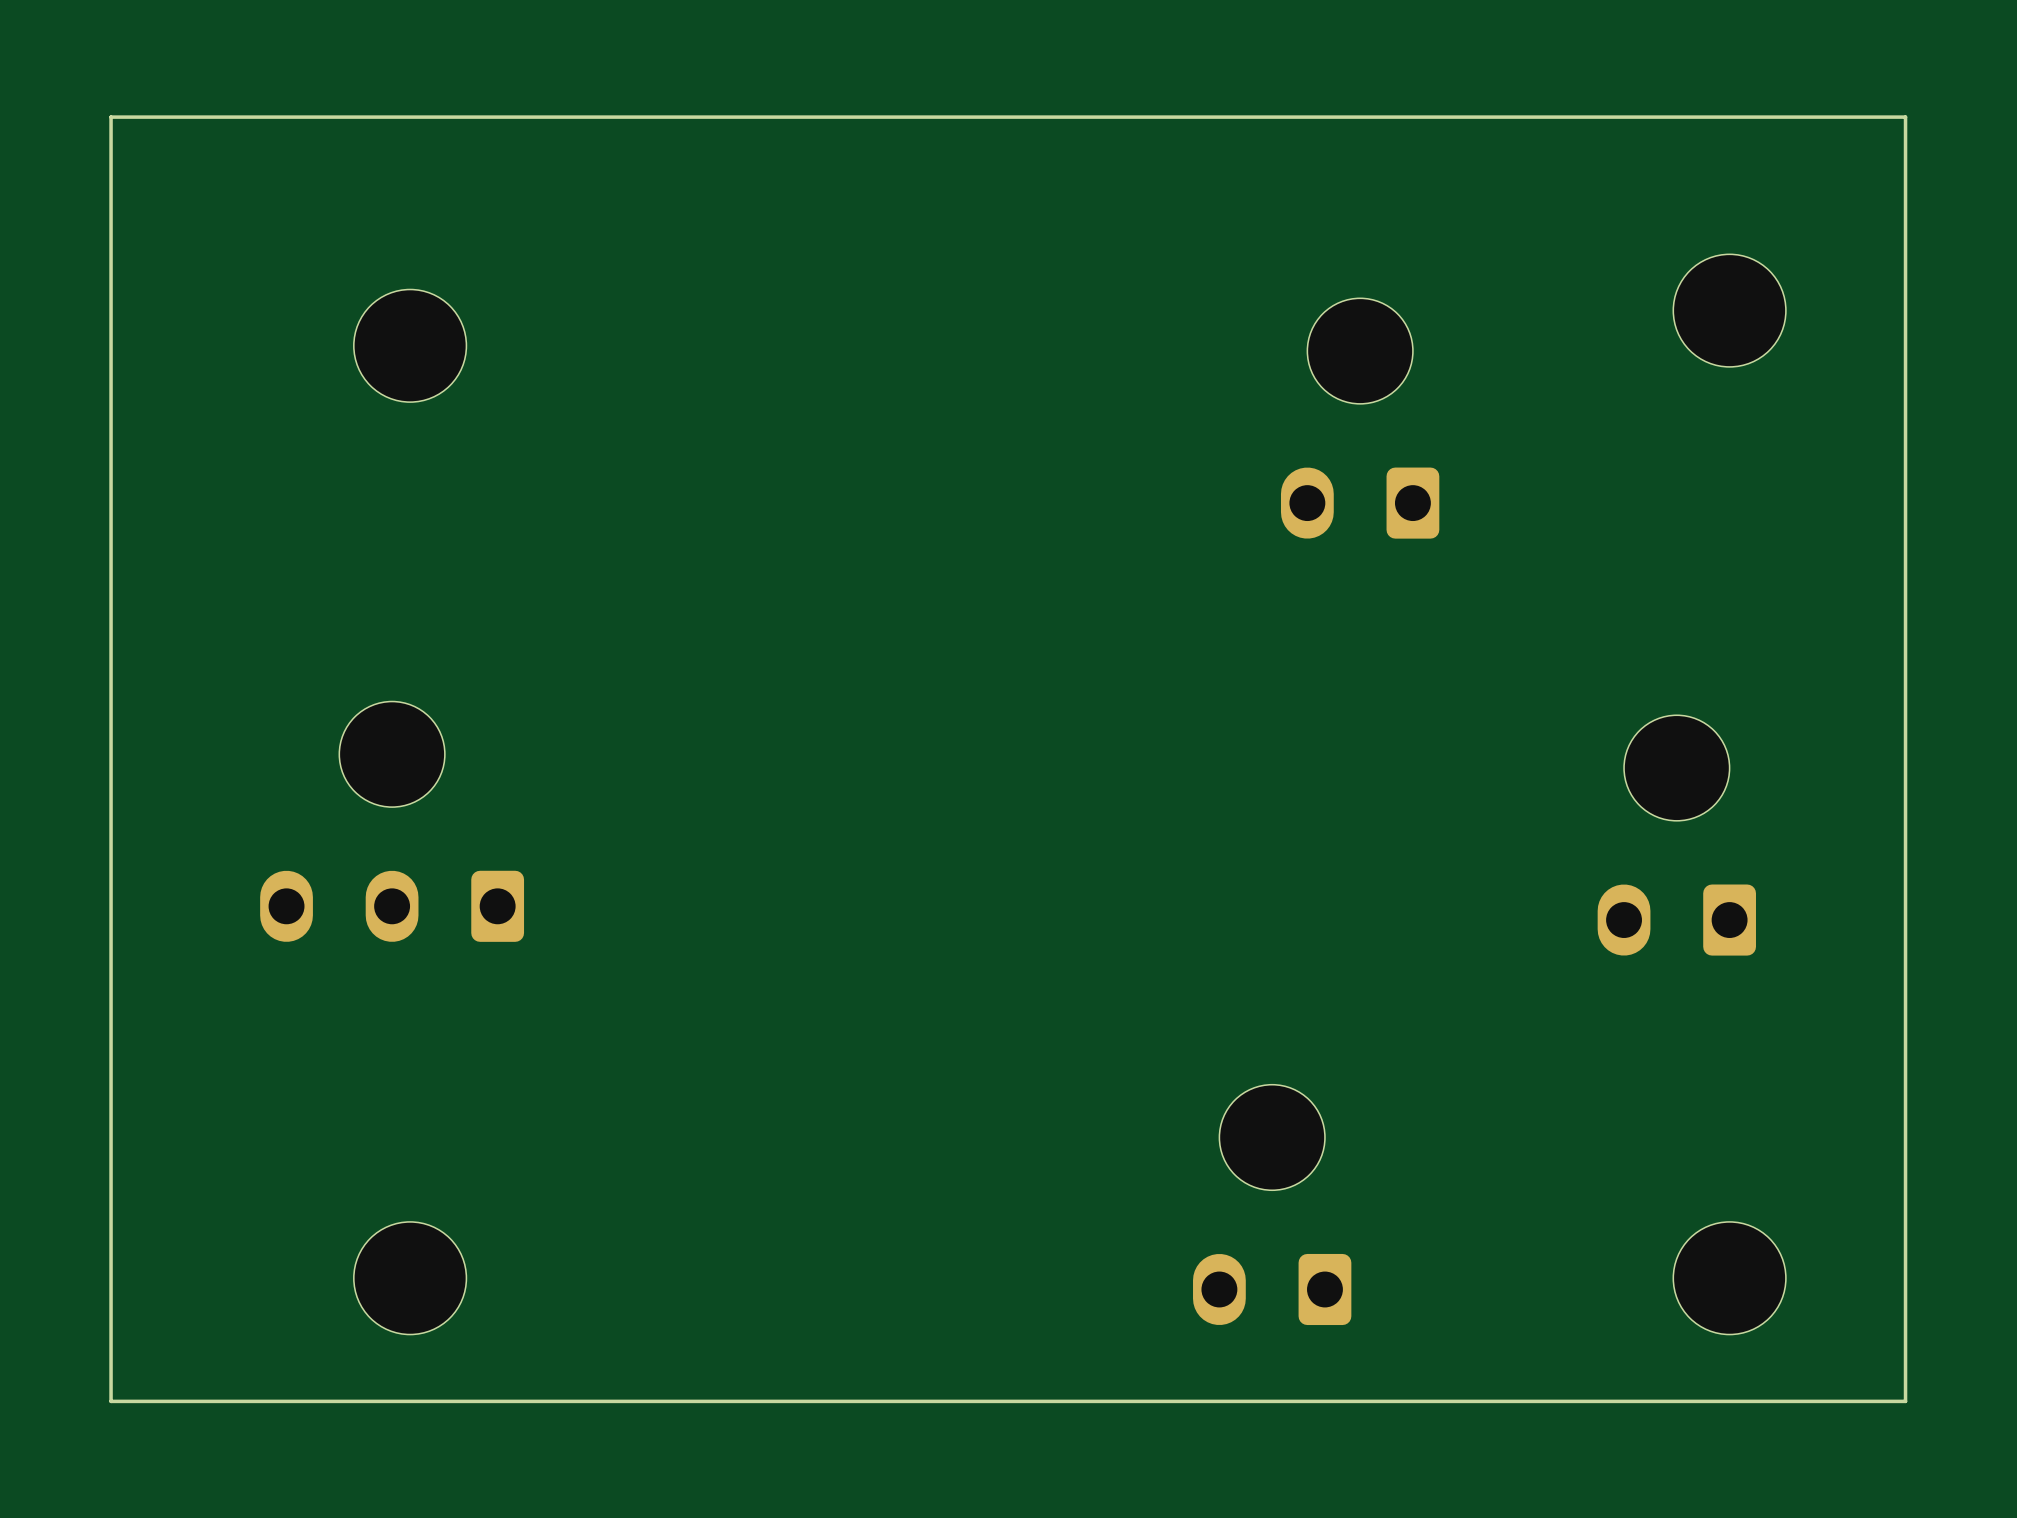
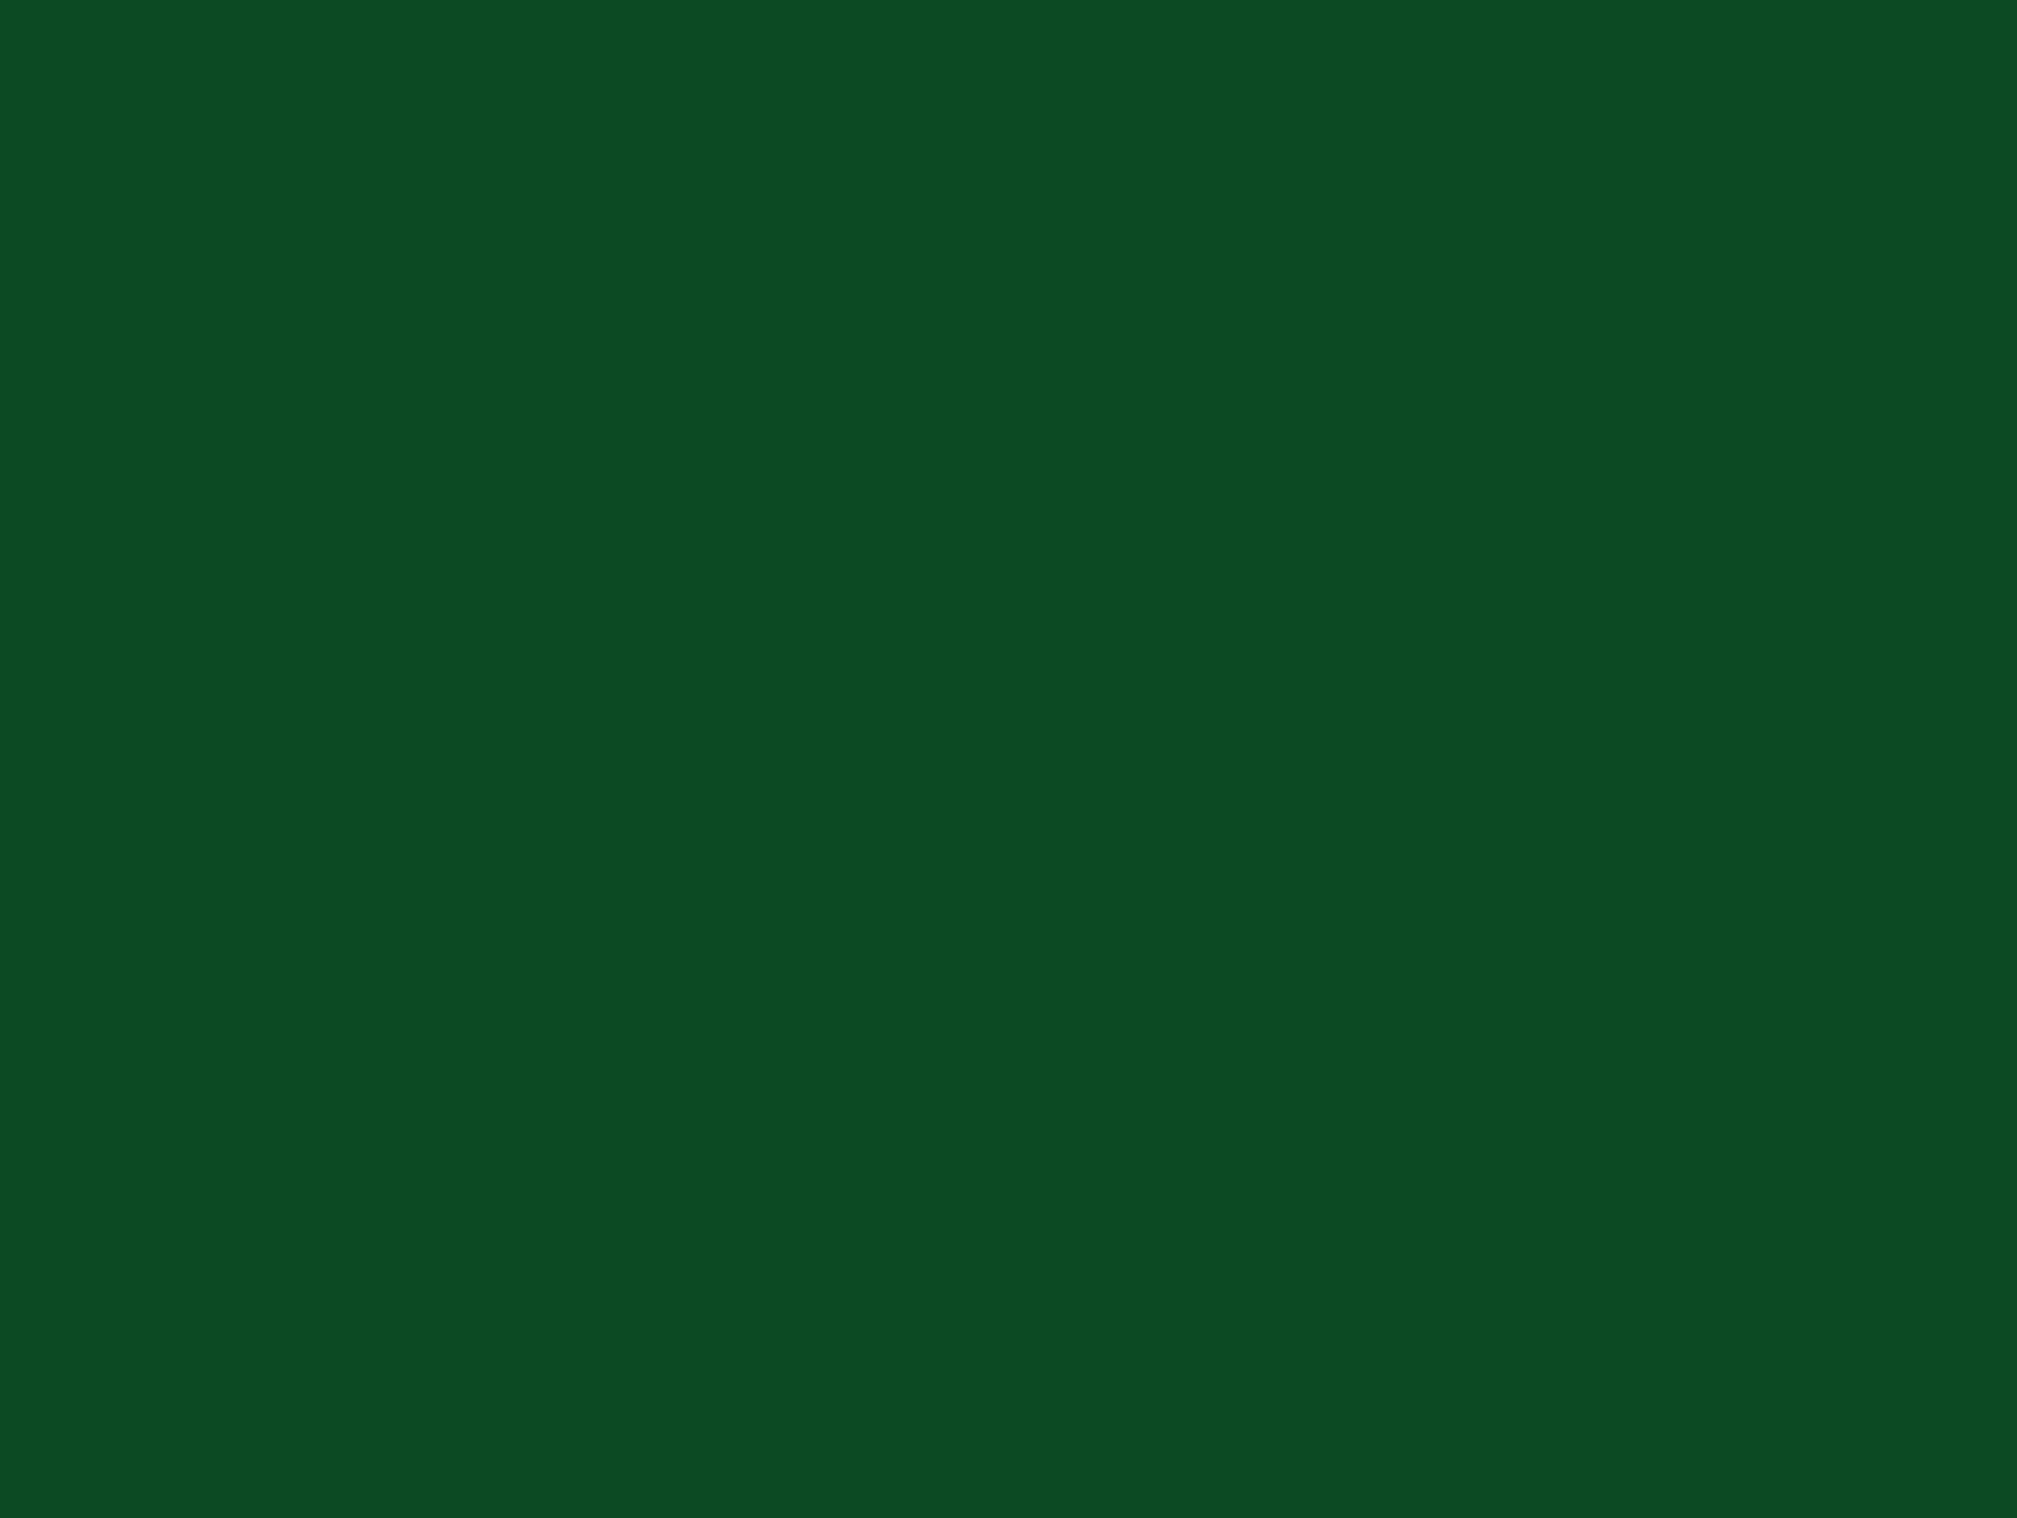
board edge: (1905, 117) (111, 117) (111, 1401) (1905, 1401) (1905, 117) -> none
part: (1729, 310) -> none
part: (410, 345) -> none
part: (1360, 418) -> none
part: (392, 821) -> none
part: (1676, 835) -> none
part: (1272, 1204) -> none
part: (410, 1278) -> none
part: (1729, 1278) -> none

